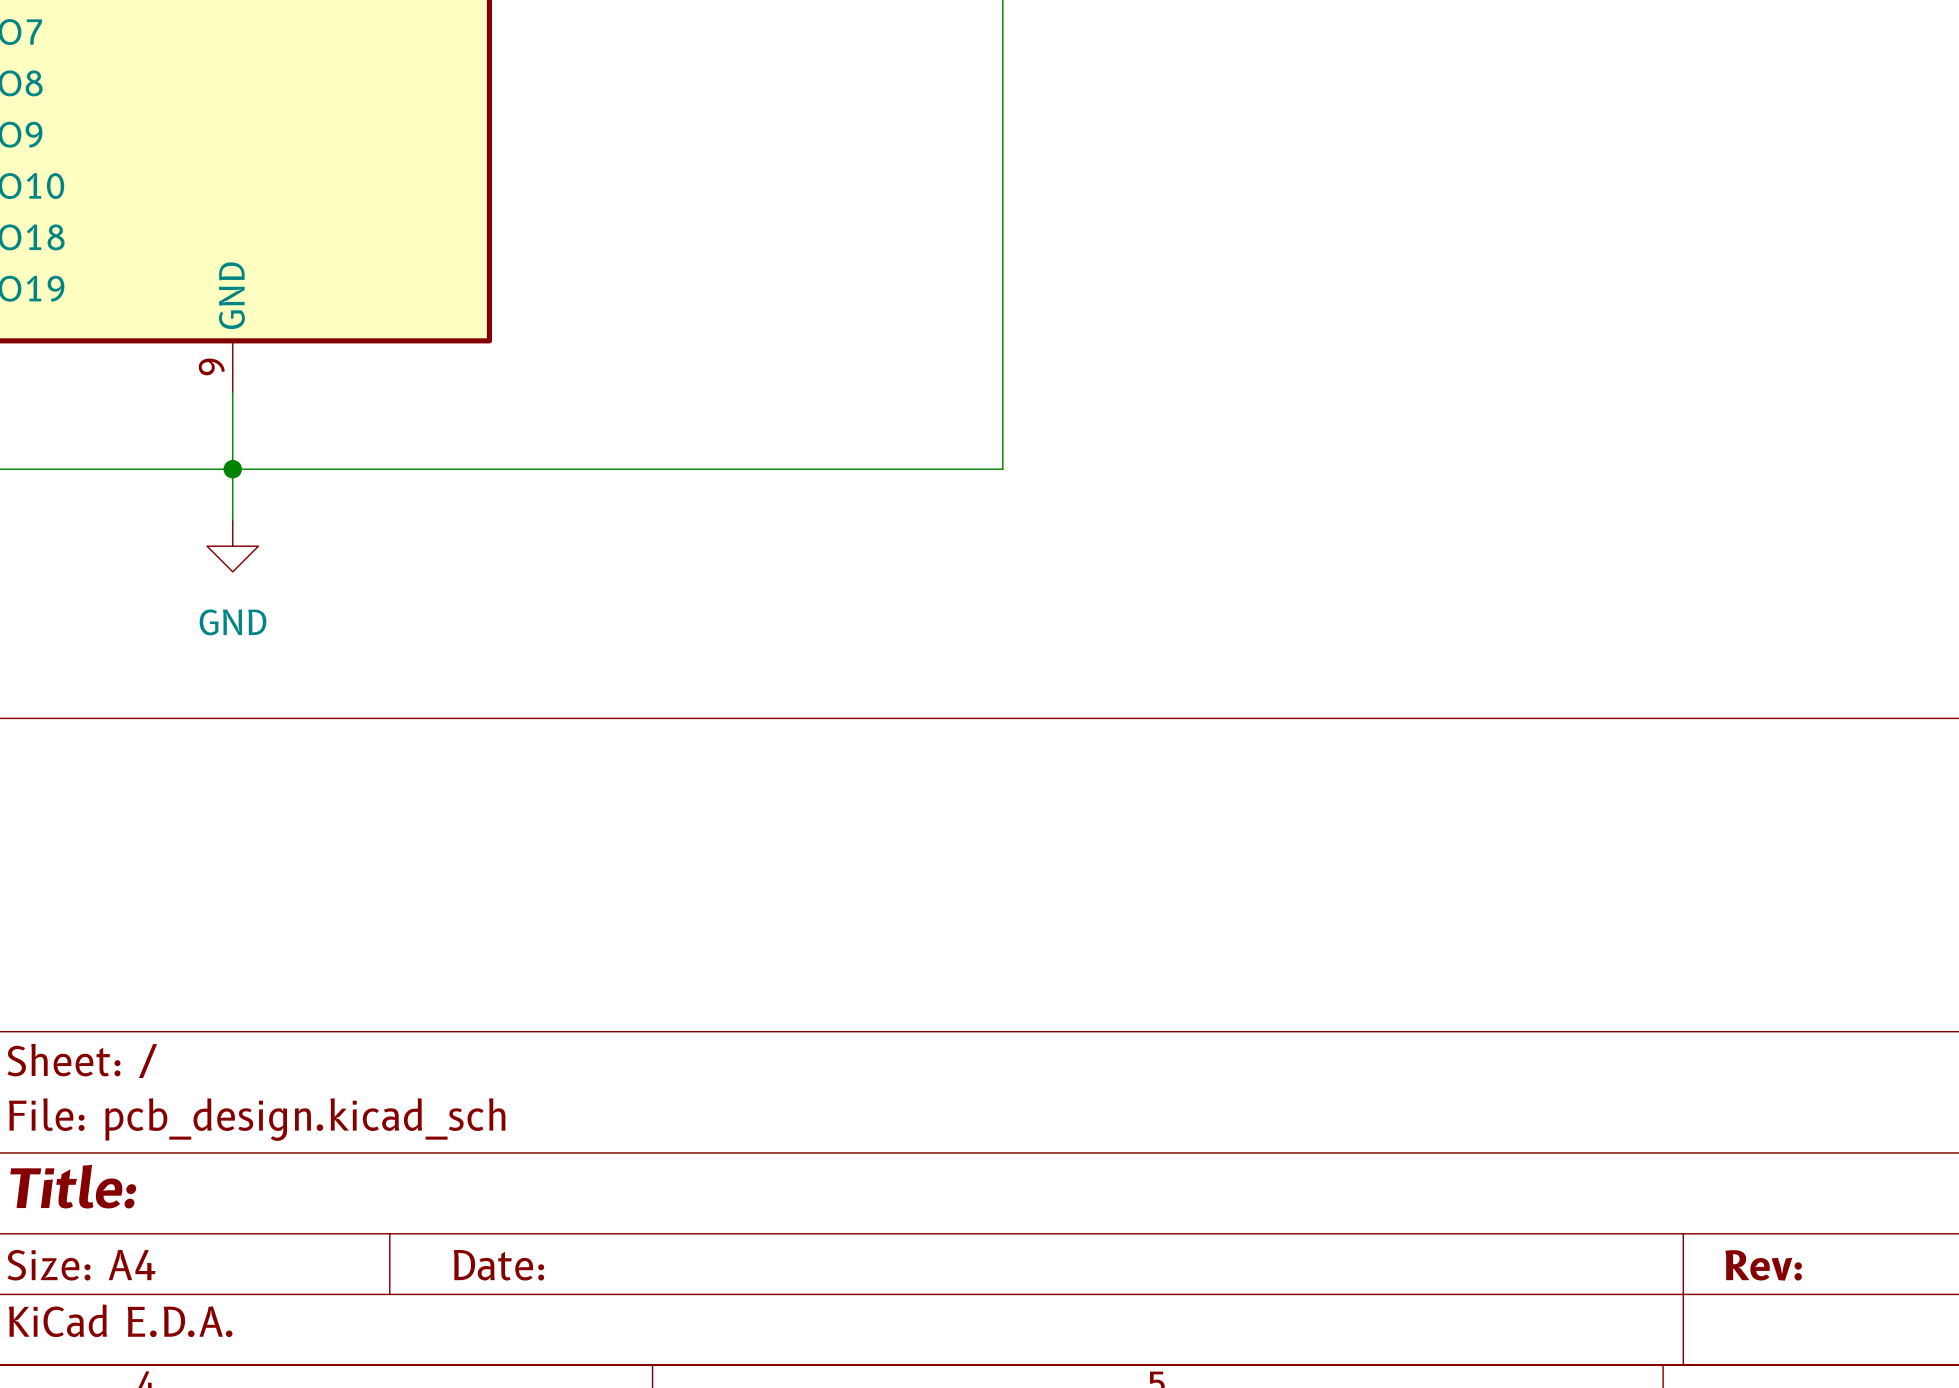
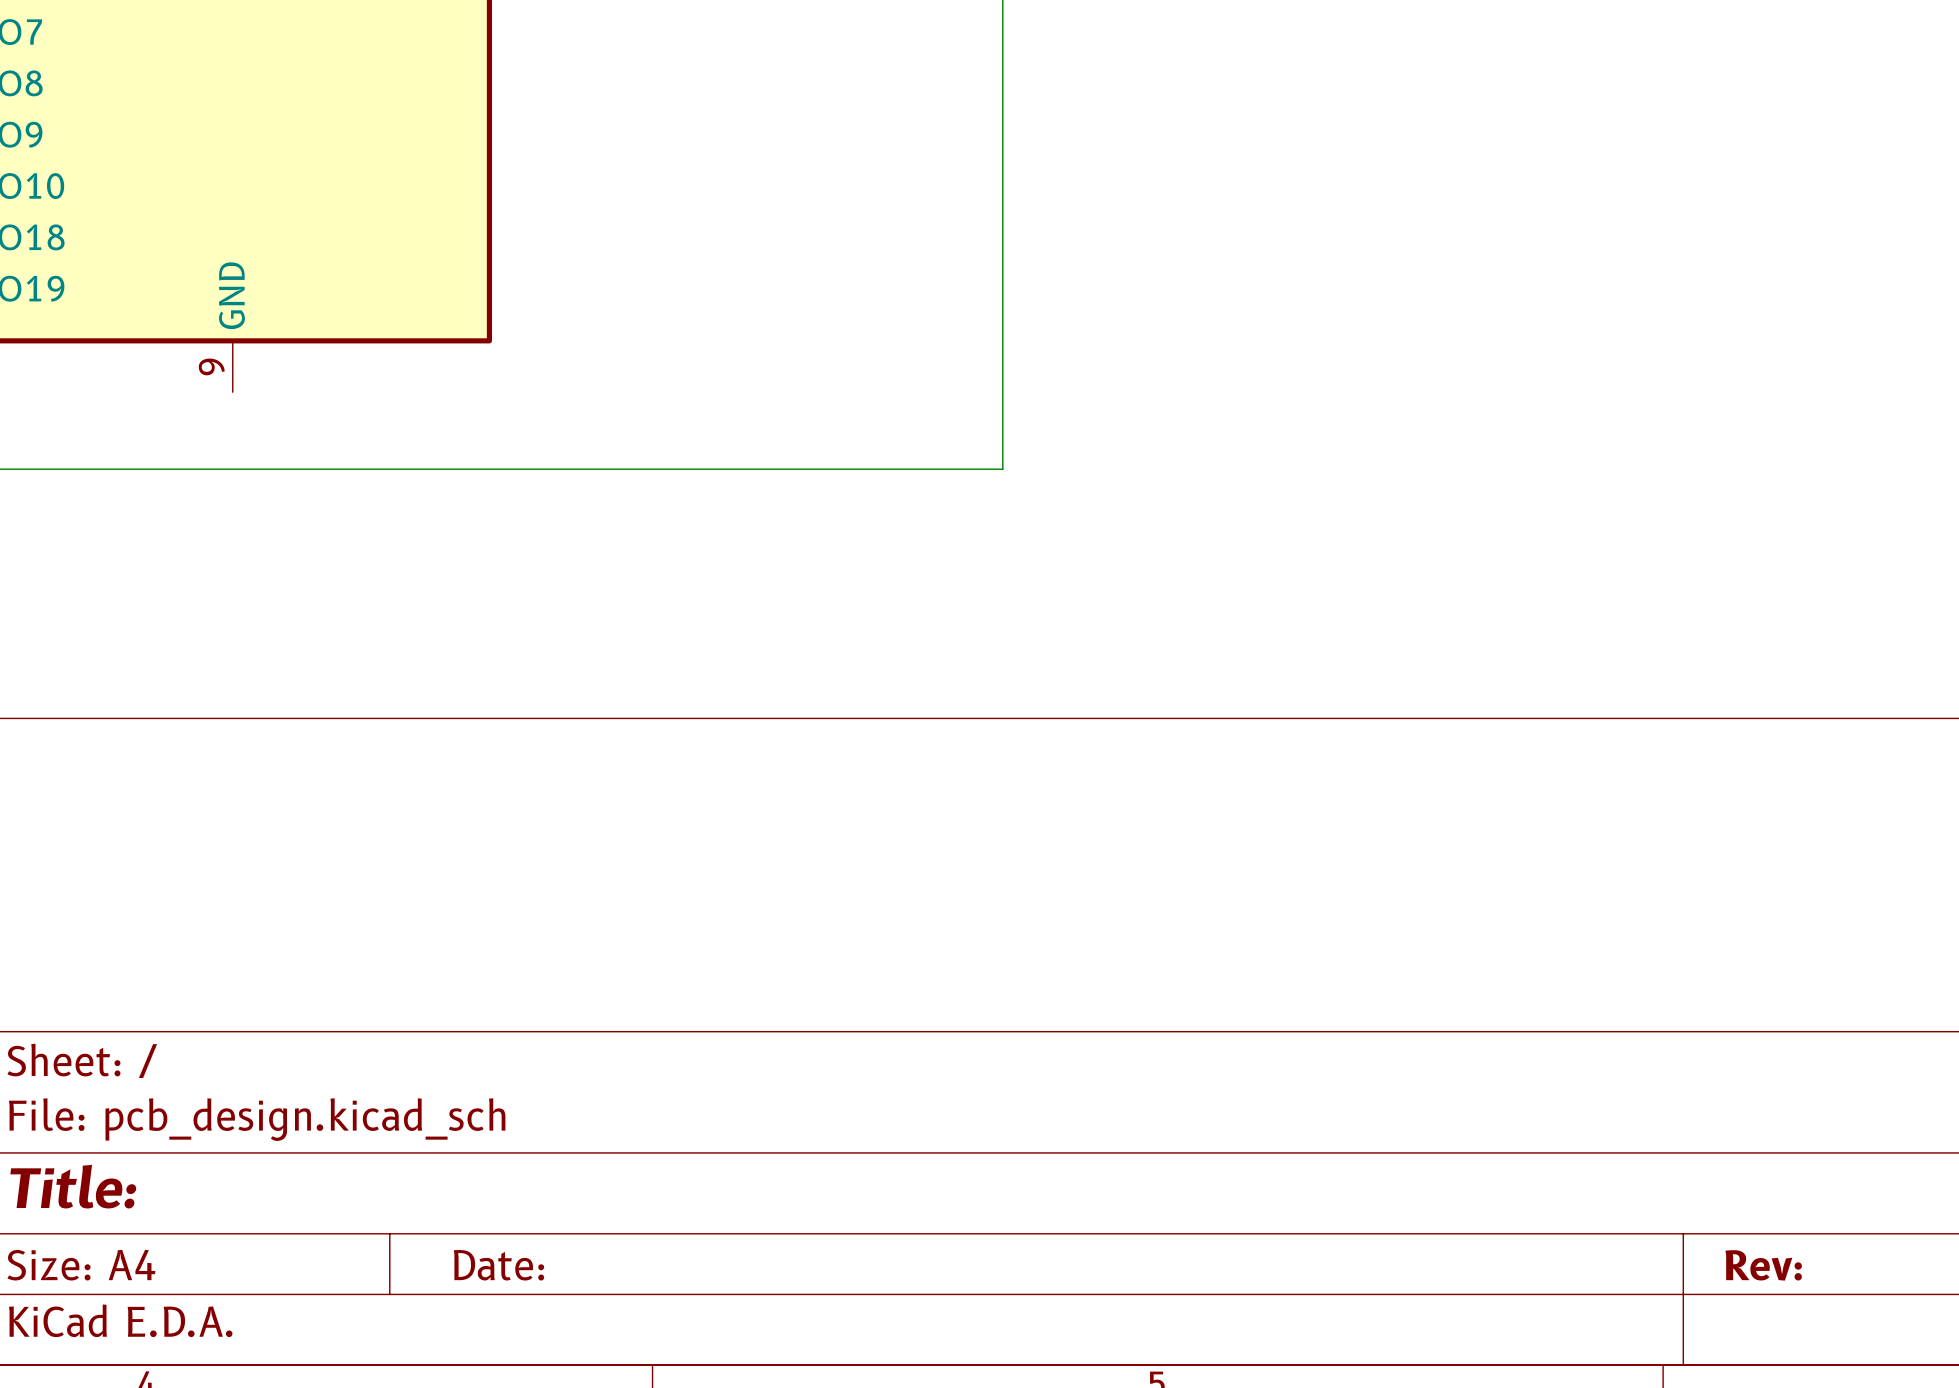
wire: (232, 392) (232, 520) -> none
junction: (232, 469) -> none
power symbol: GND (232, 546) -> none

